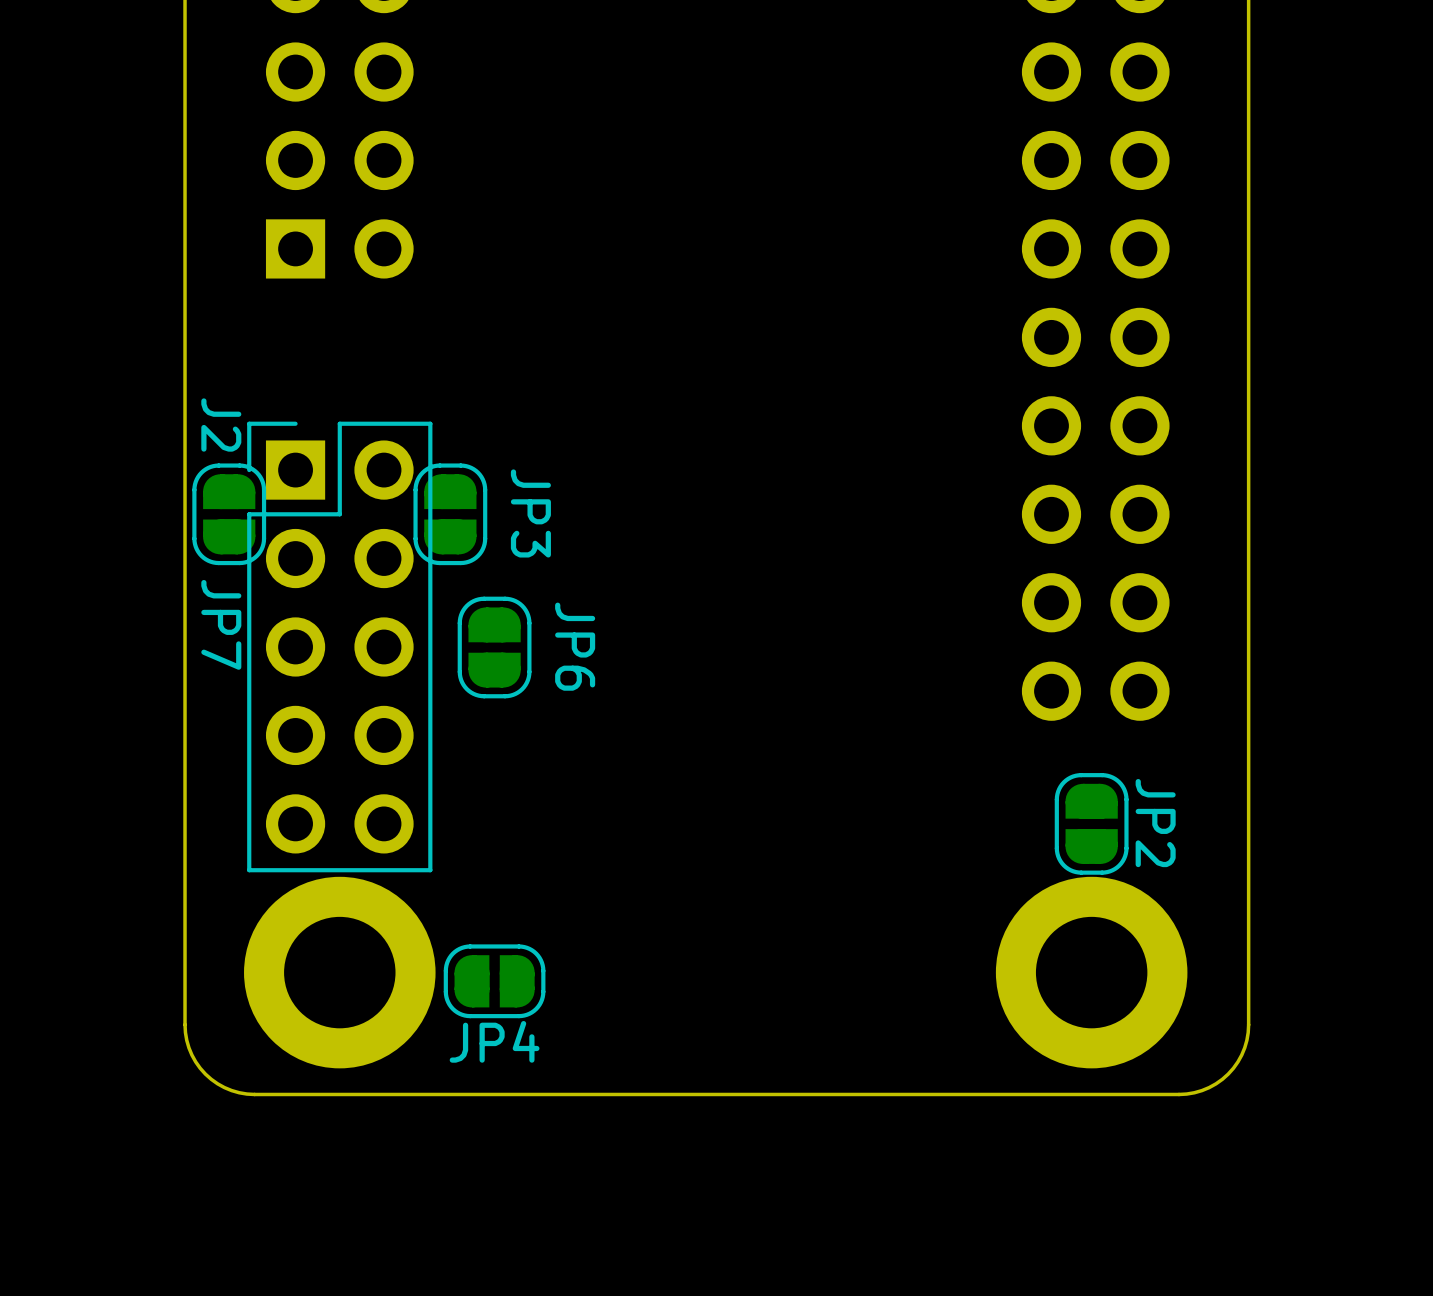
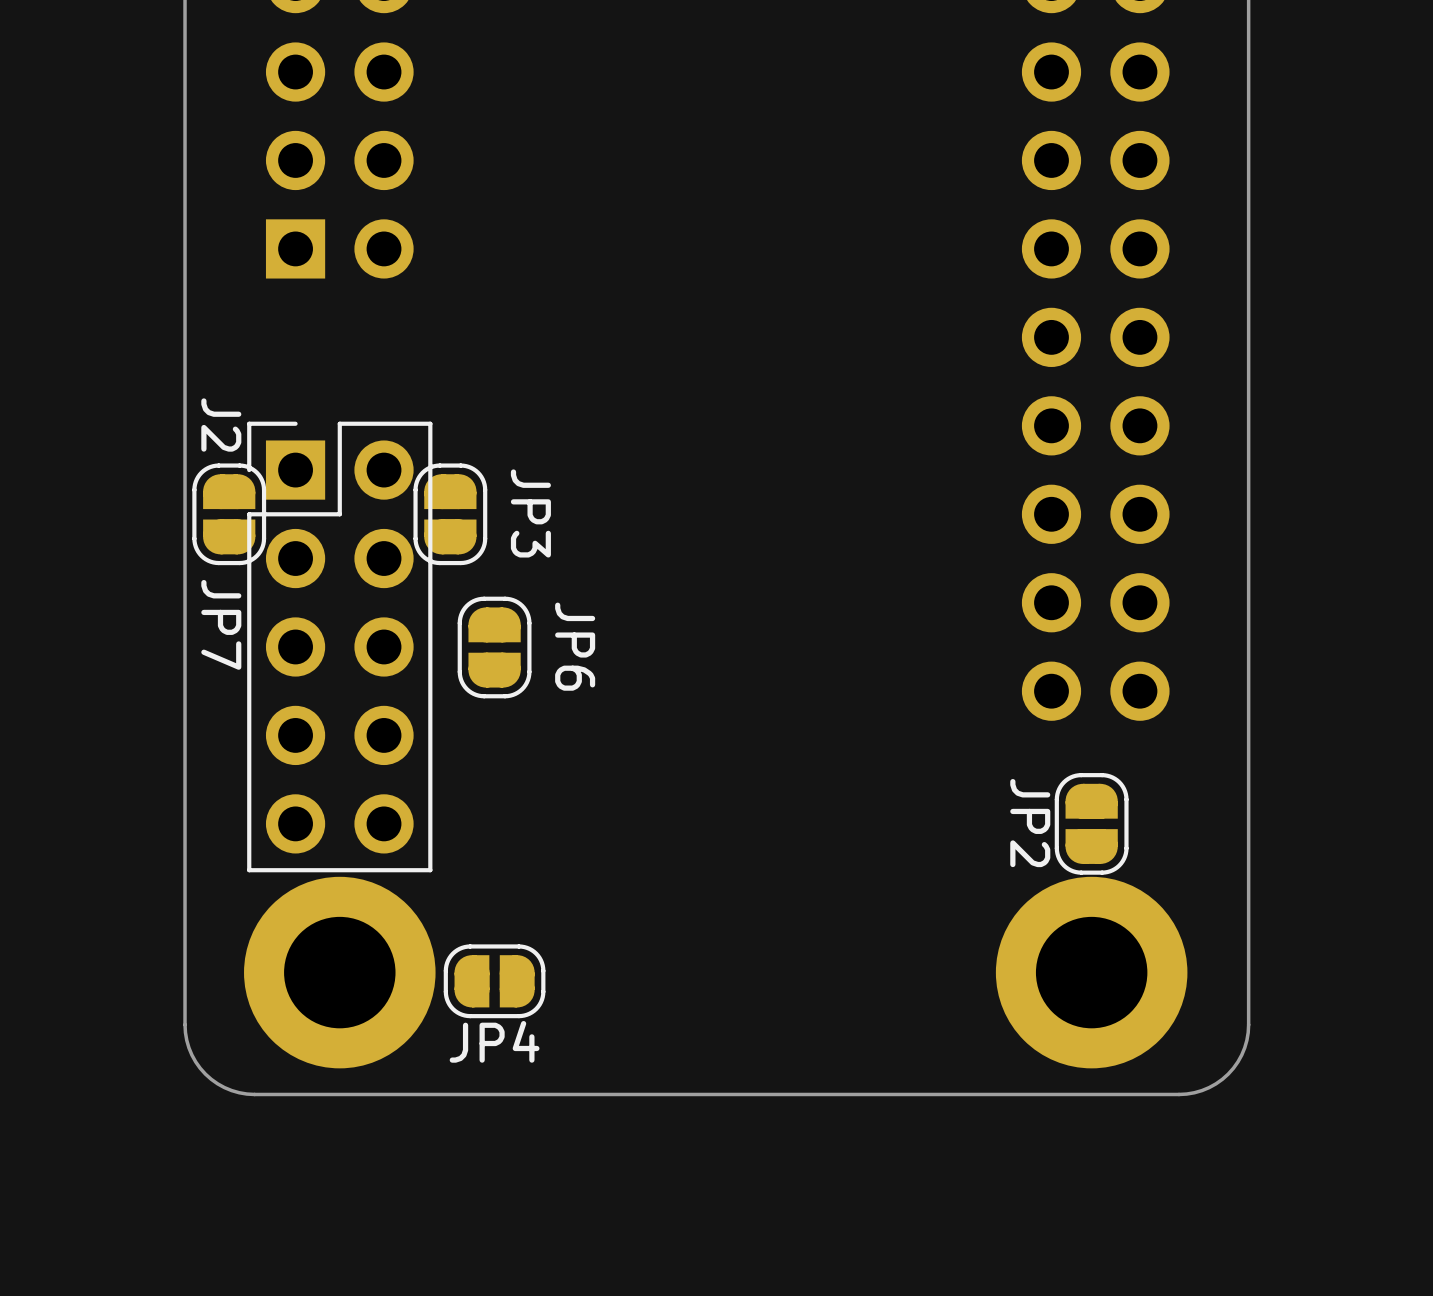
JP2 name position: JP2 (1155, 823) -> JP2 (1030, 823)

